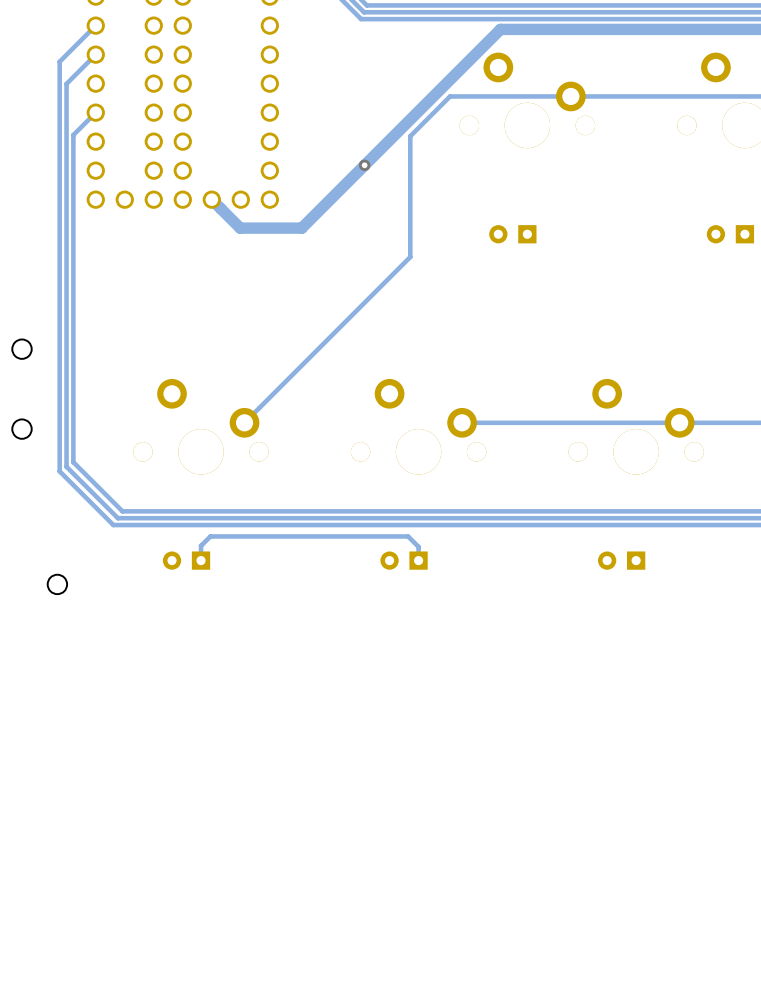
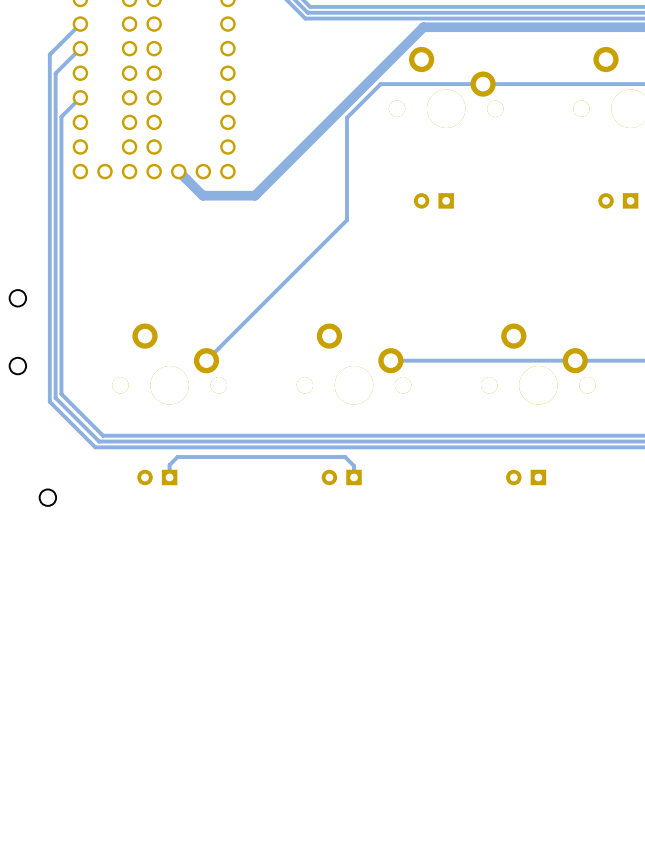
via: (364, 165) -> none

